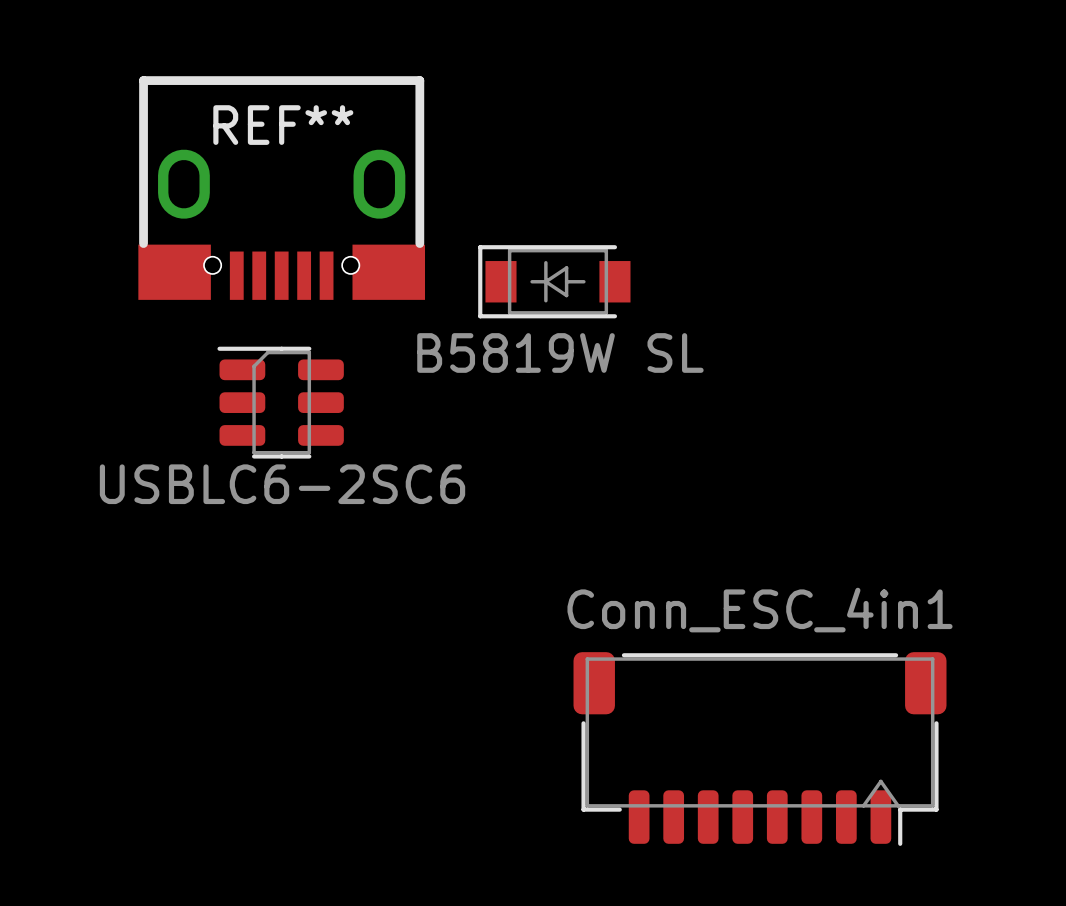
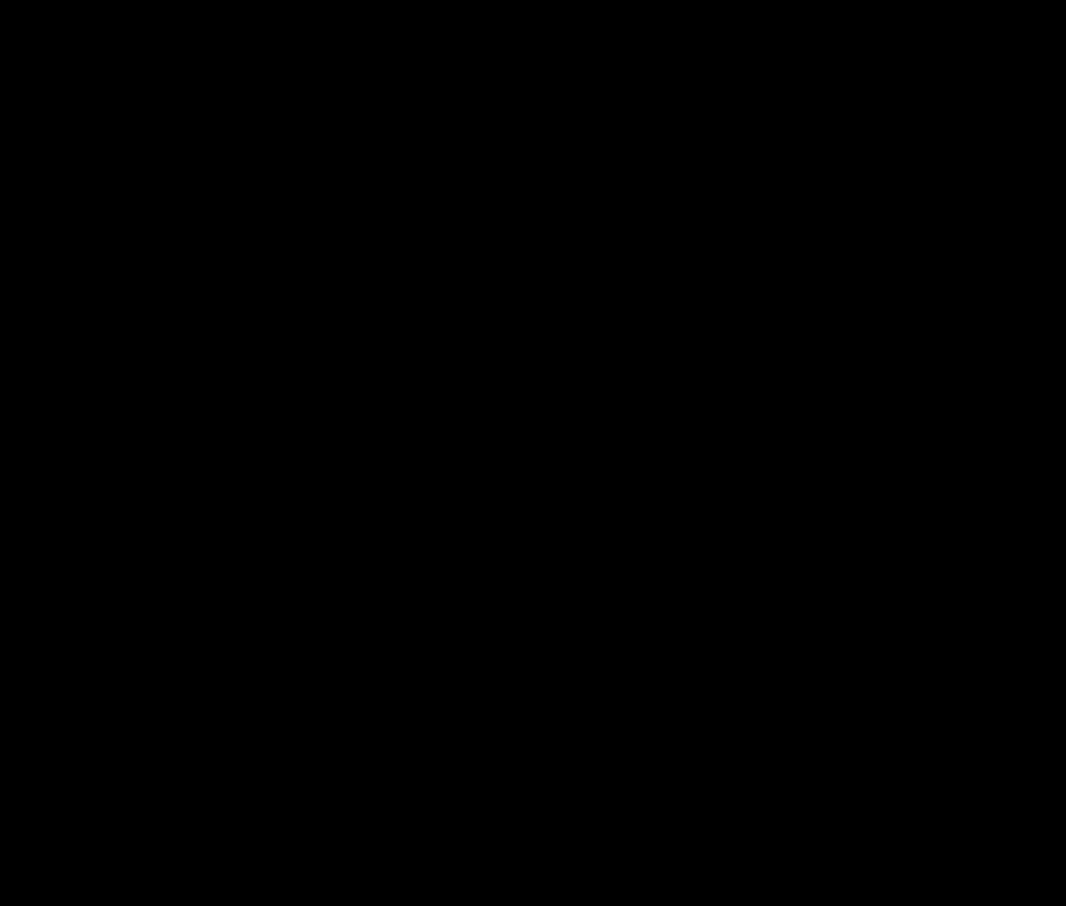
part: (281, 188) -> none
part: B5819W SL (554, 281) -> none
part: USBLC6-2SC6 (280, 402) -> none
part: Conn_ESC_4in1 (760, 749) -> none

